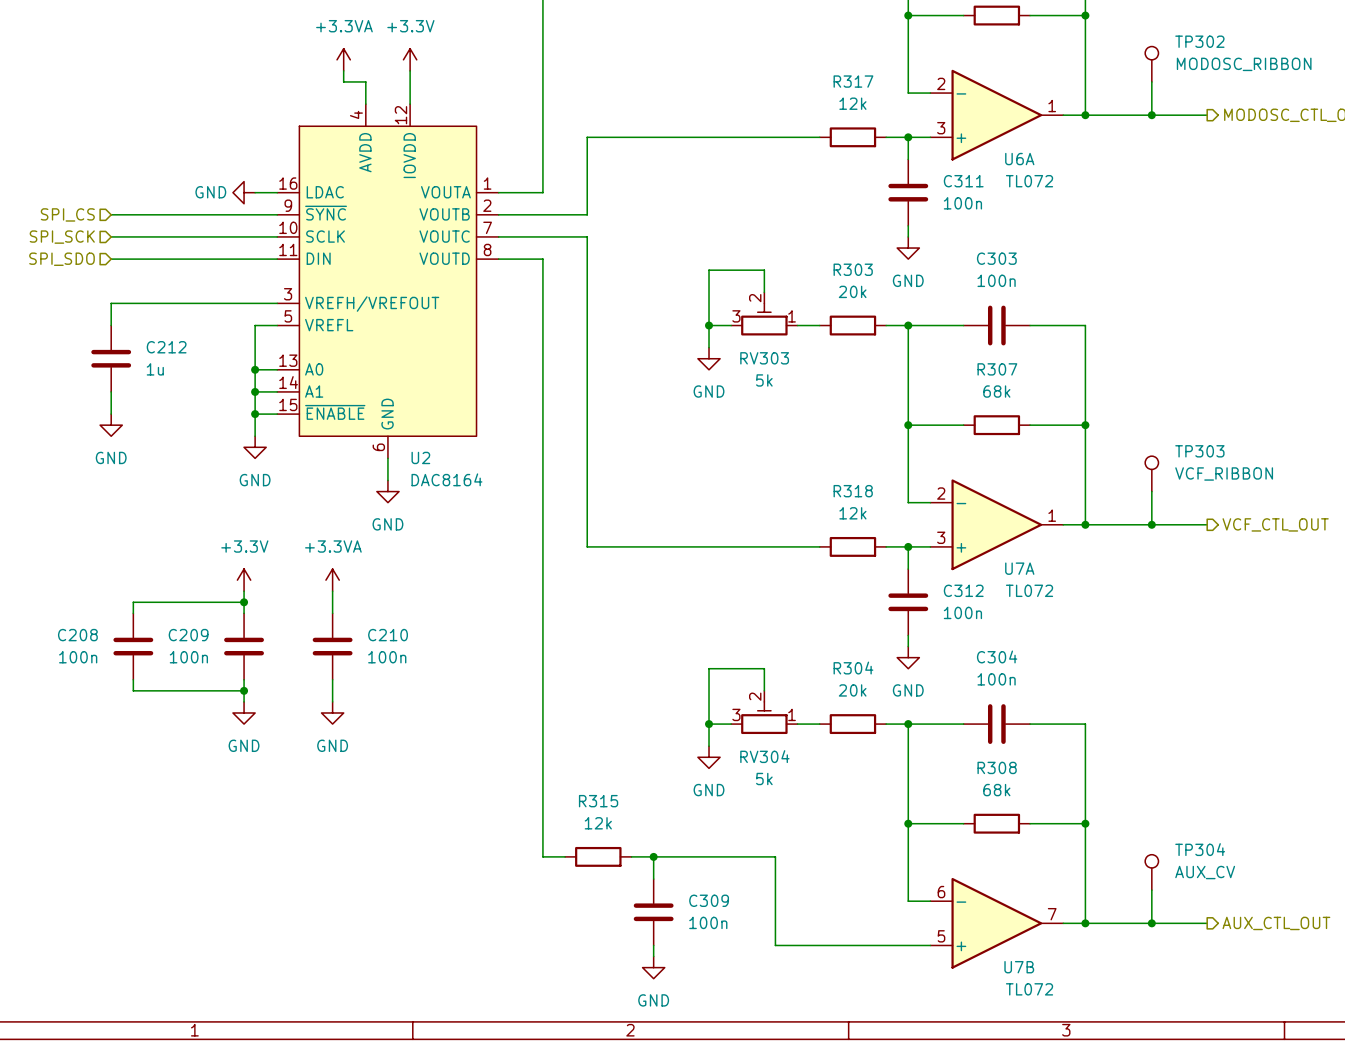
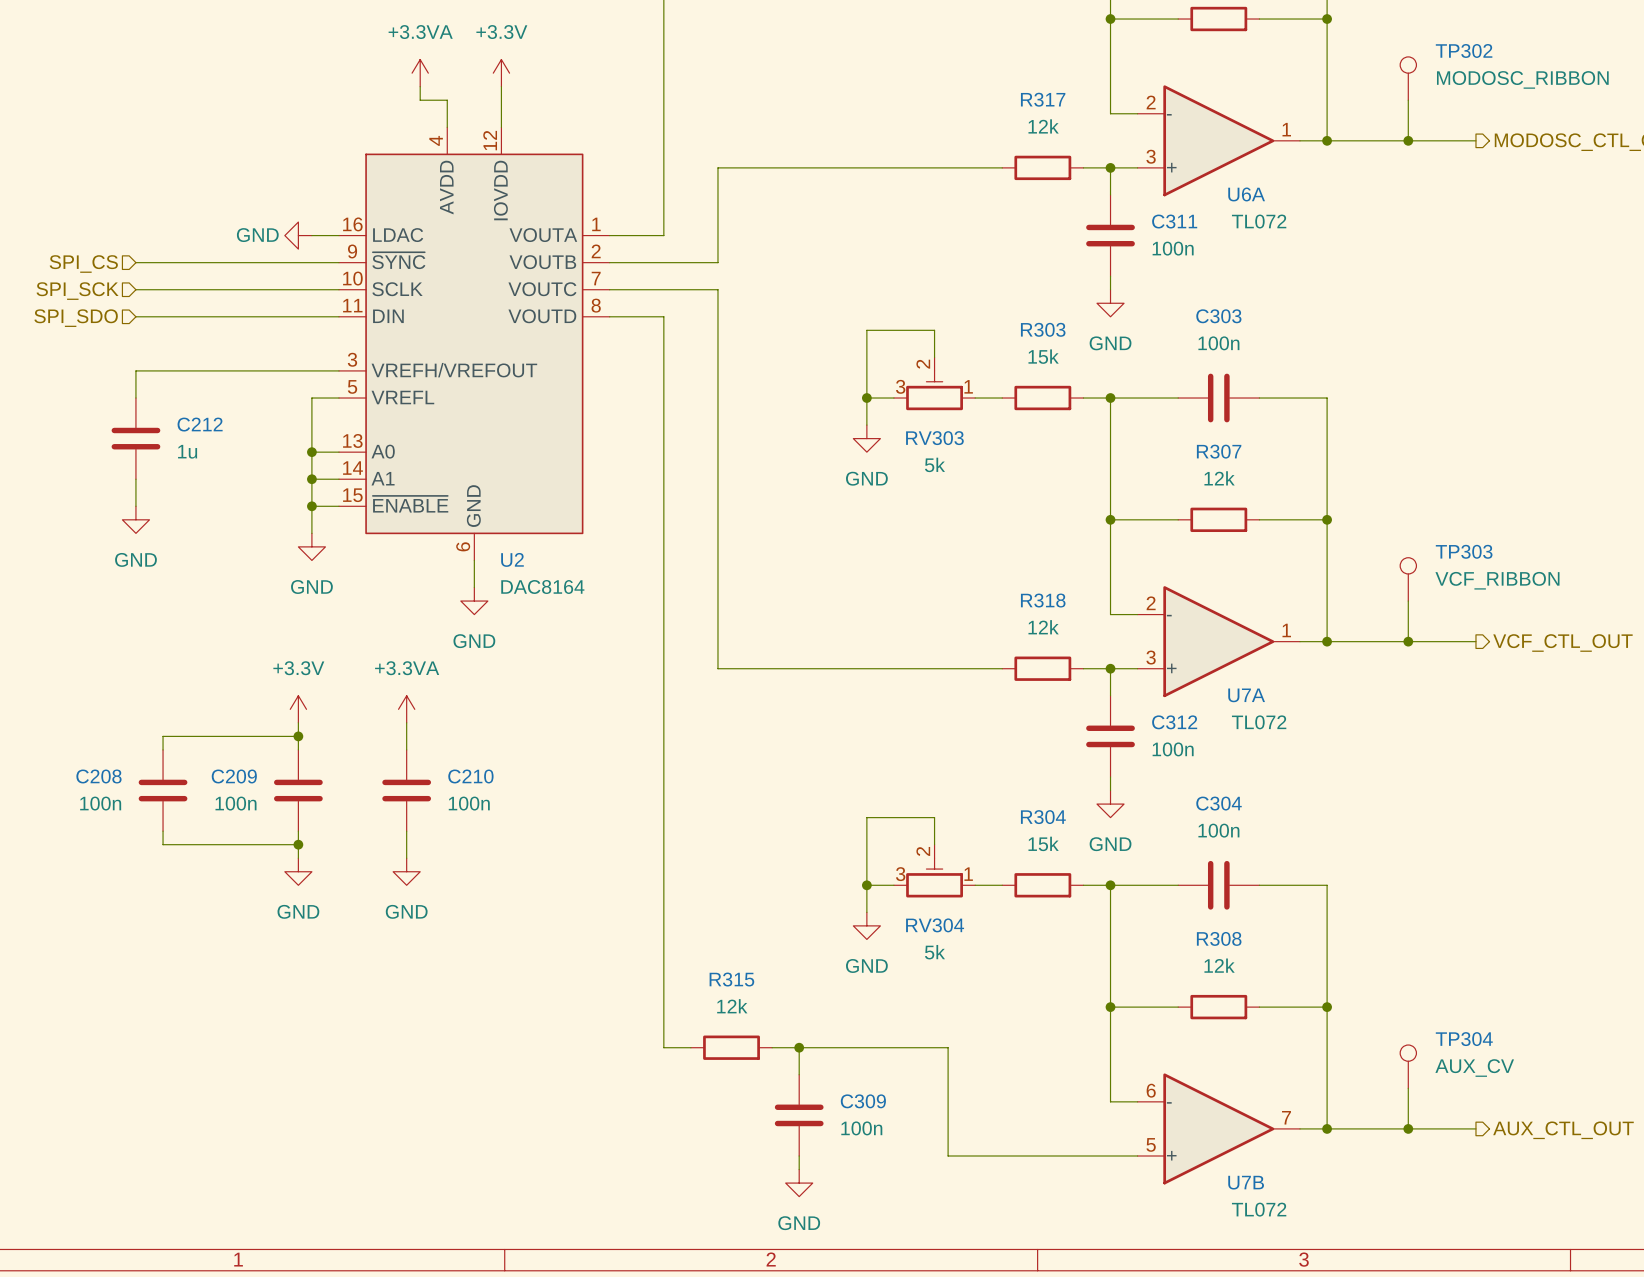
R303 value: 20k (852, 291) -> 15k (1043, 356)
R307 value: 68k (996, 391) -> 12k (1219, 478)
R304 value: 20k (852, 690) -> 15k (1043, 843)
R308 value: 68k (996, 790) -> 12k (1219, 965)

